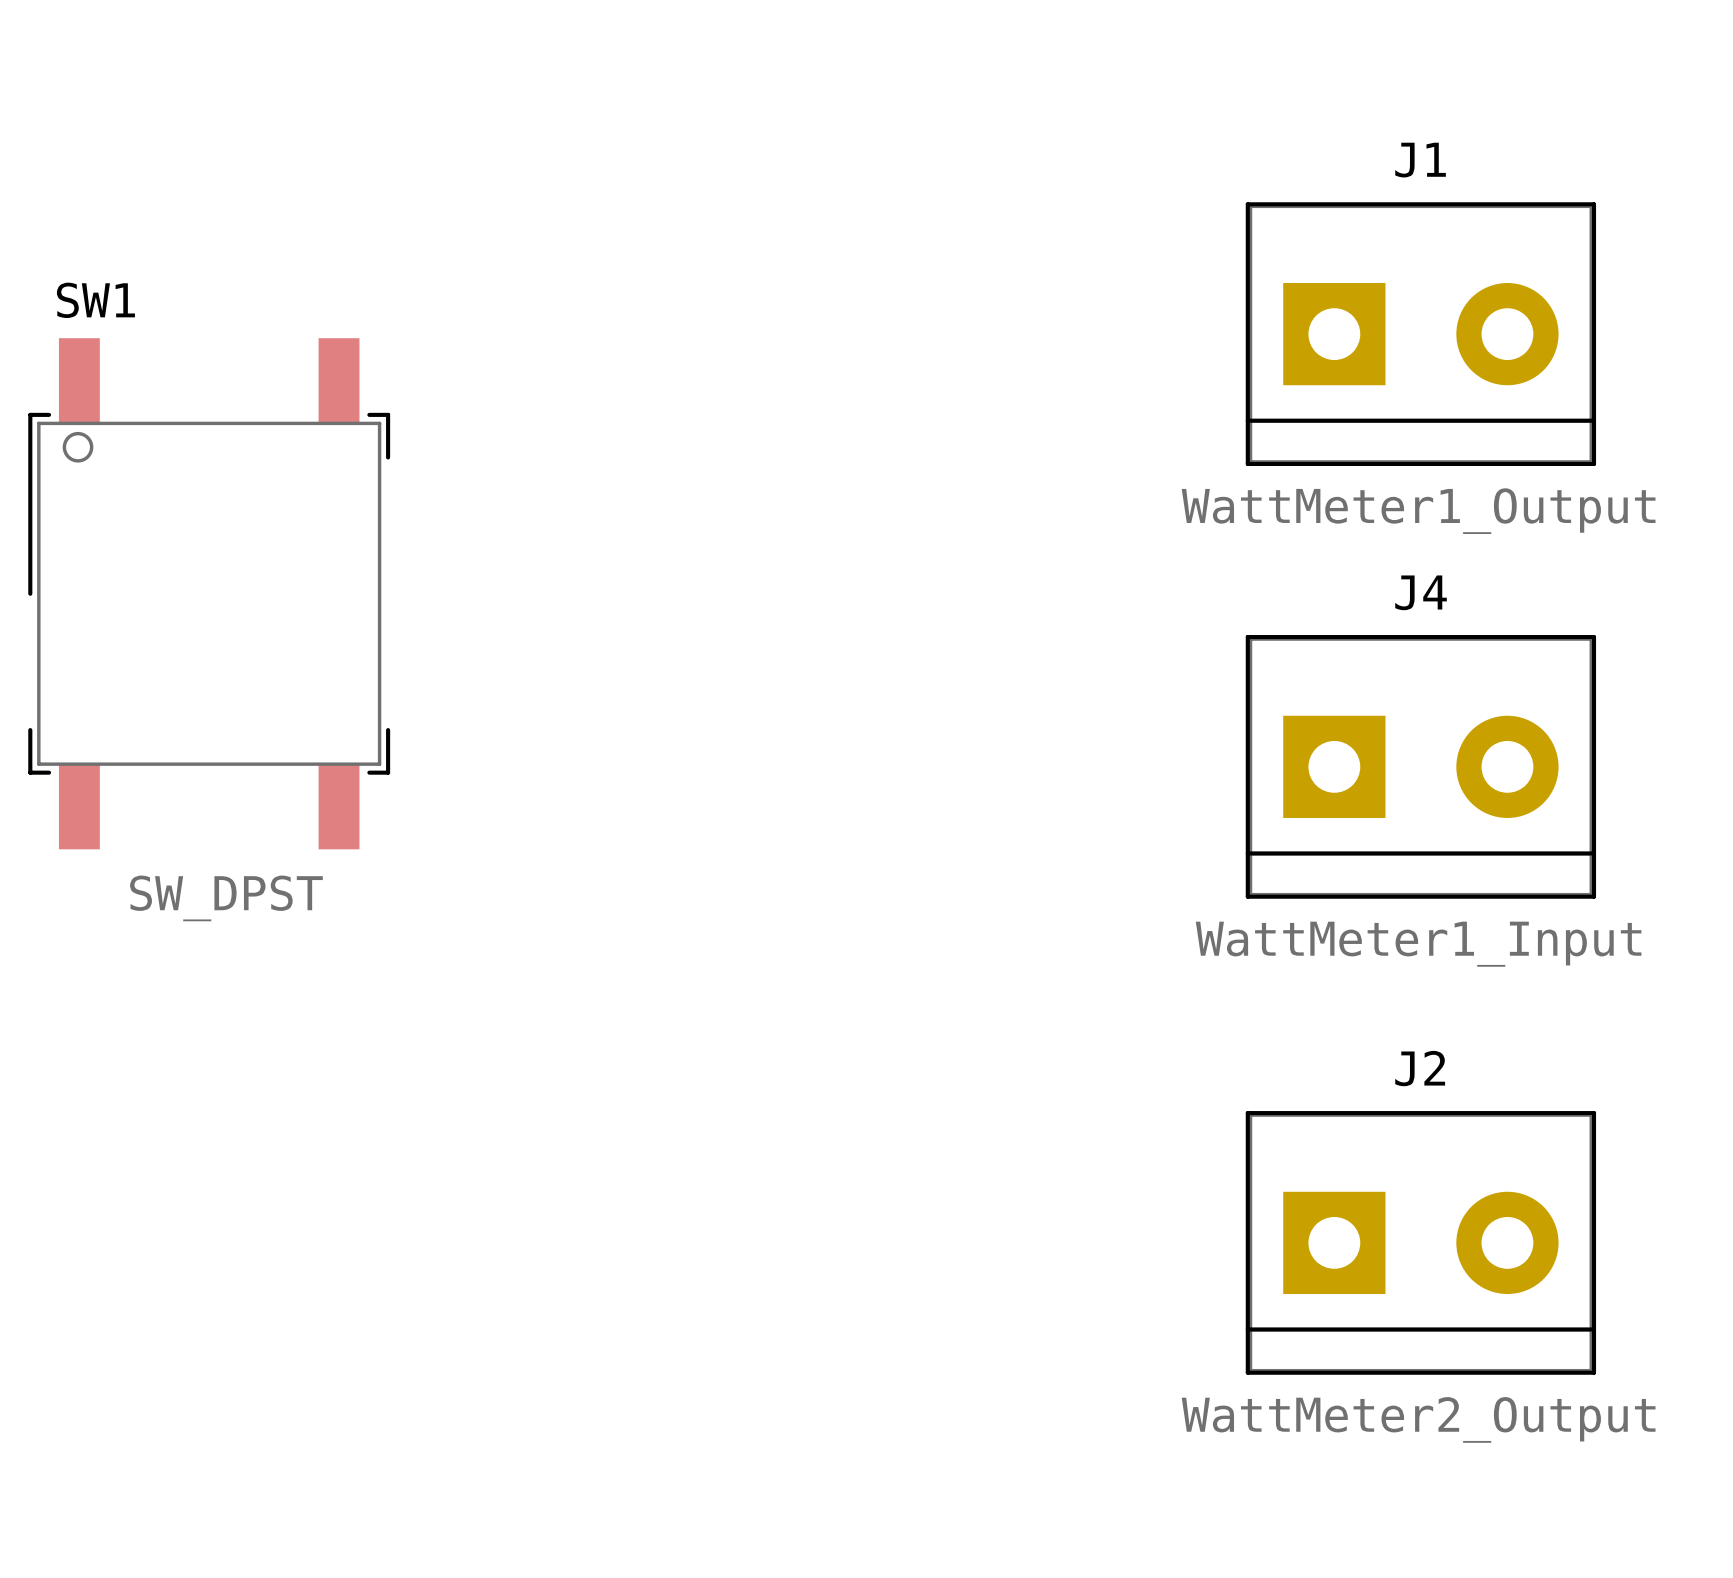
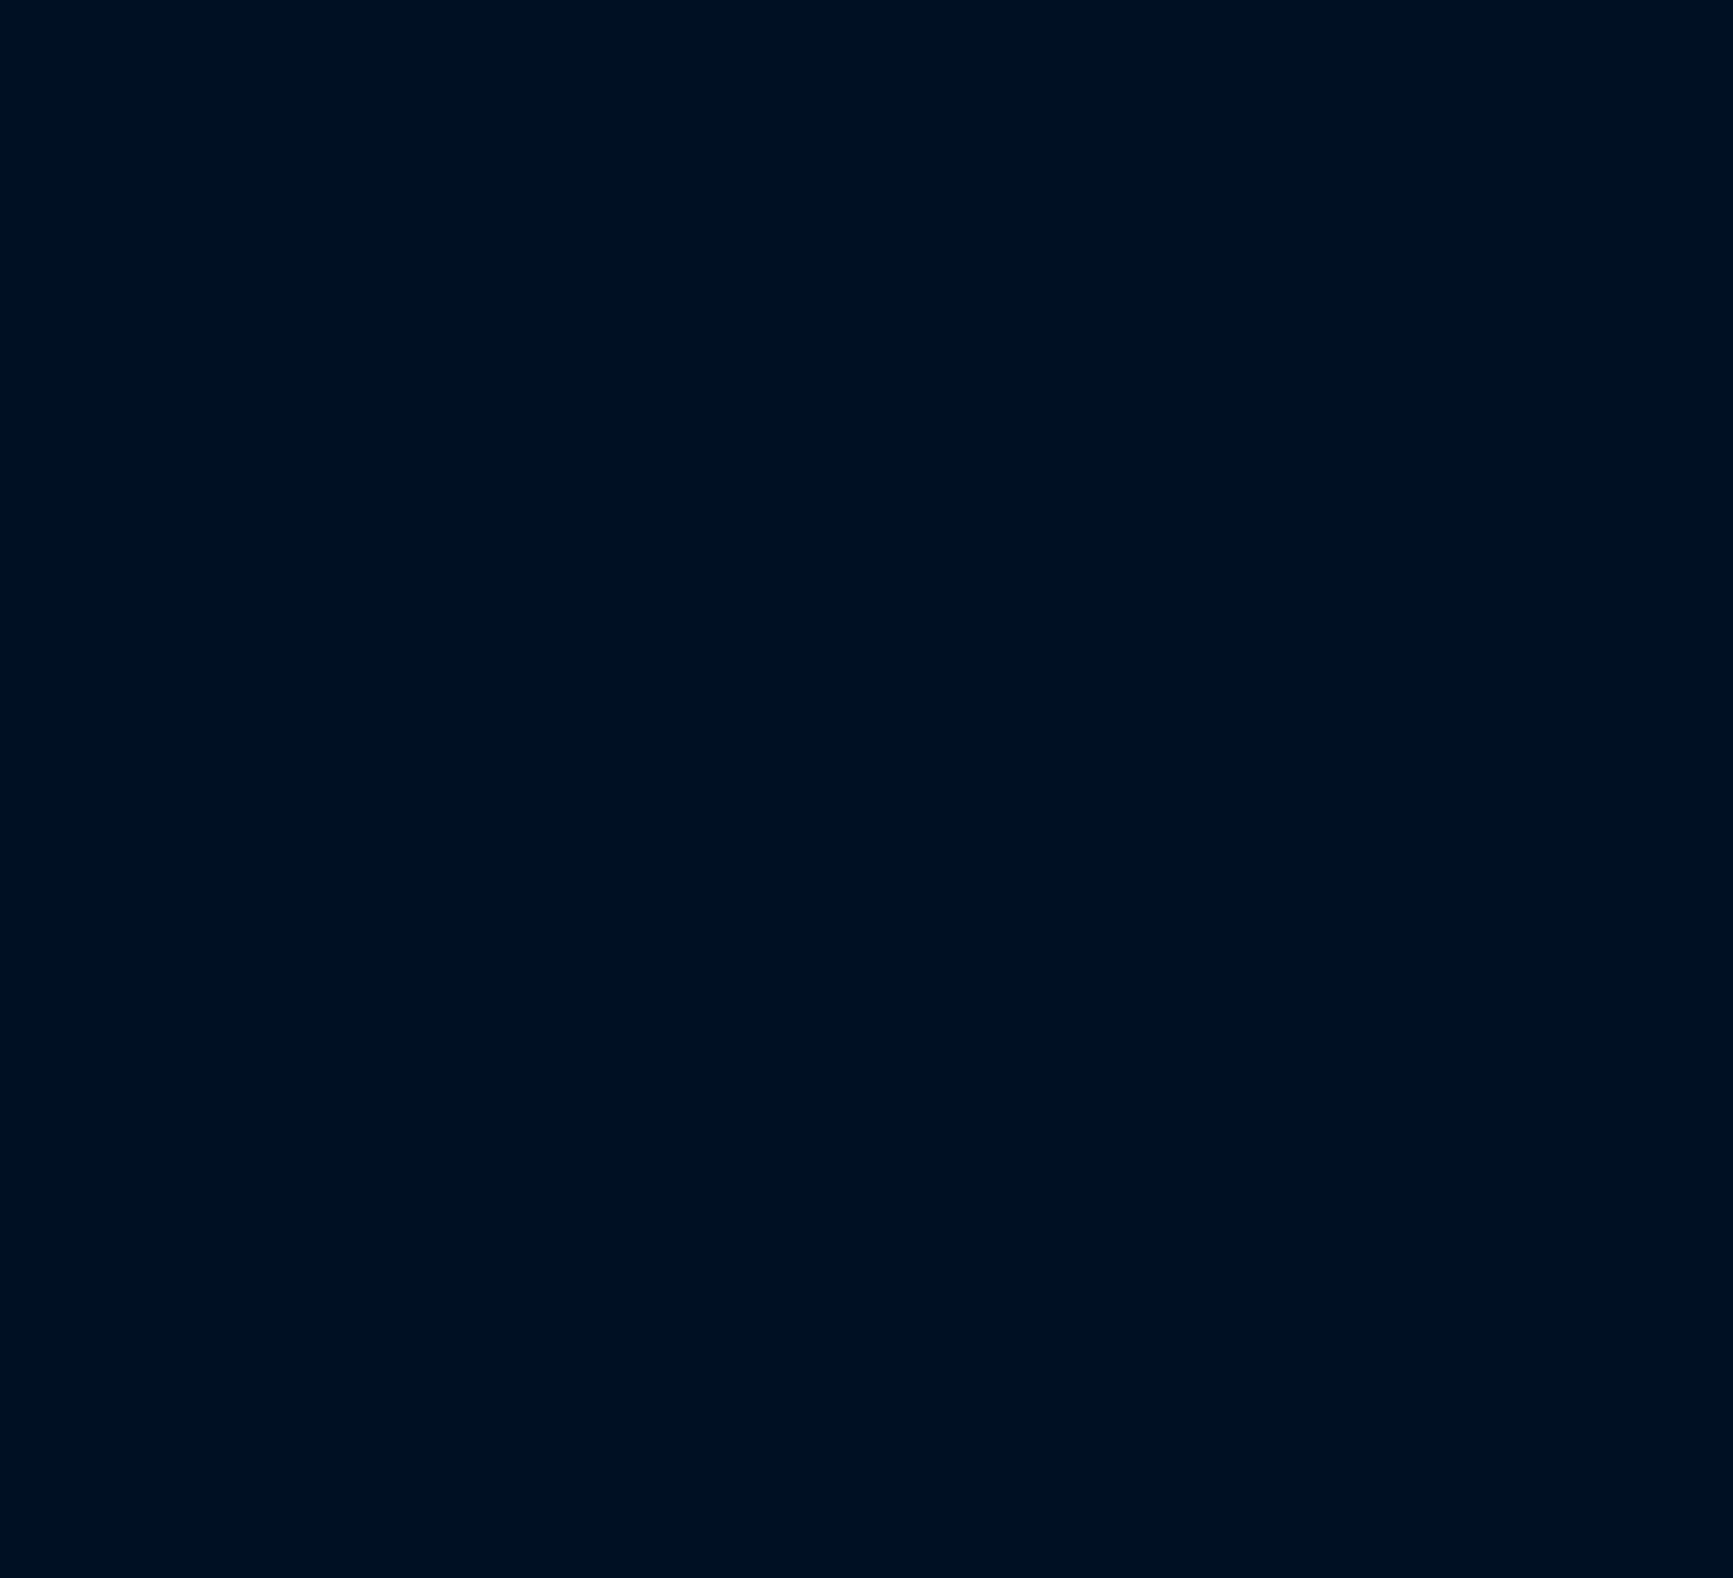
J1: WattMeter1_Output (1420, 334) -> none
SW1: SW_DPST (209, 593) -> none
J4: WattMeter1_Input (1420, 766) -> none
J2: WattMeter2_Output (1420, 1242) -> none

